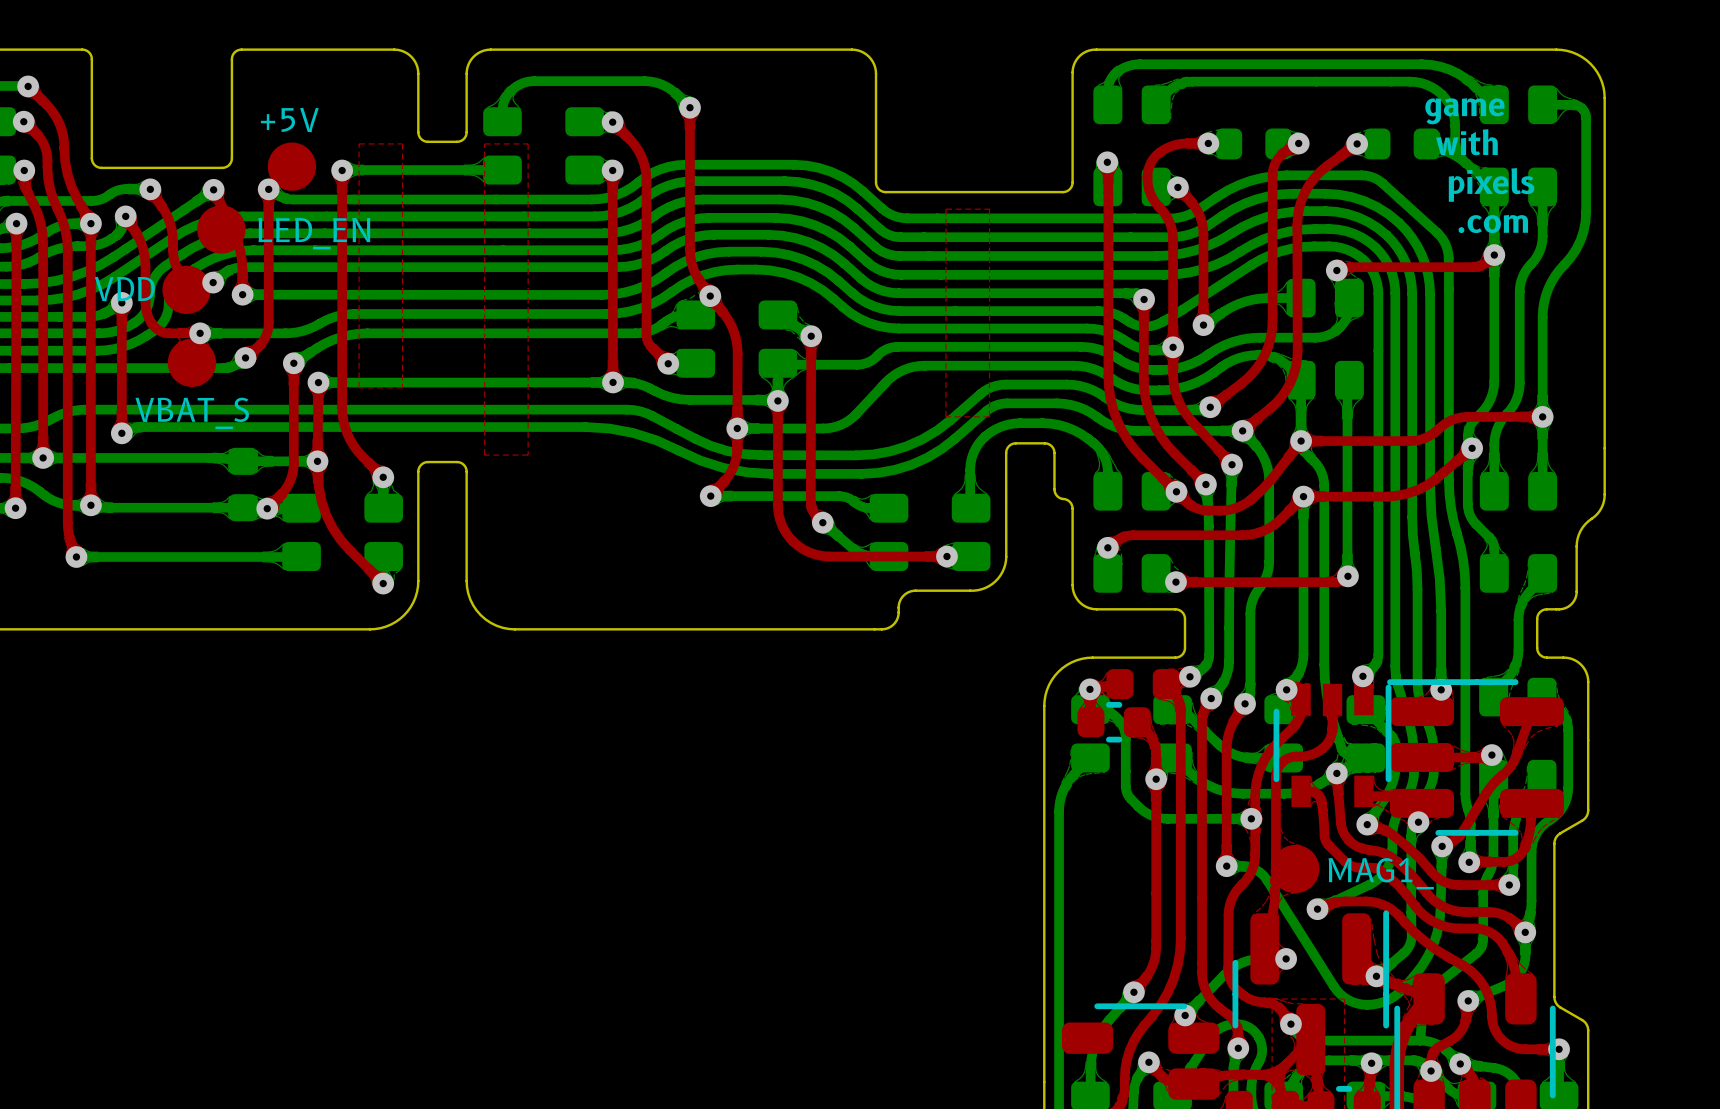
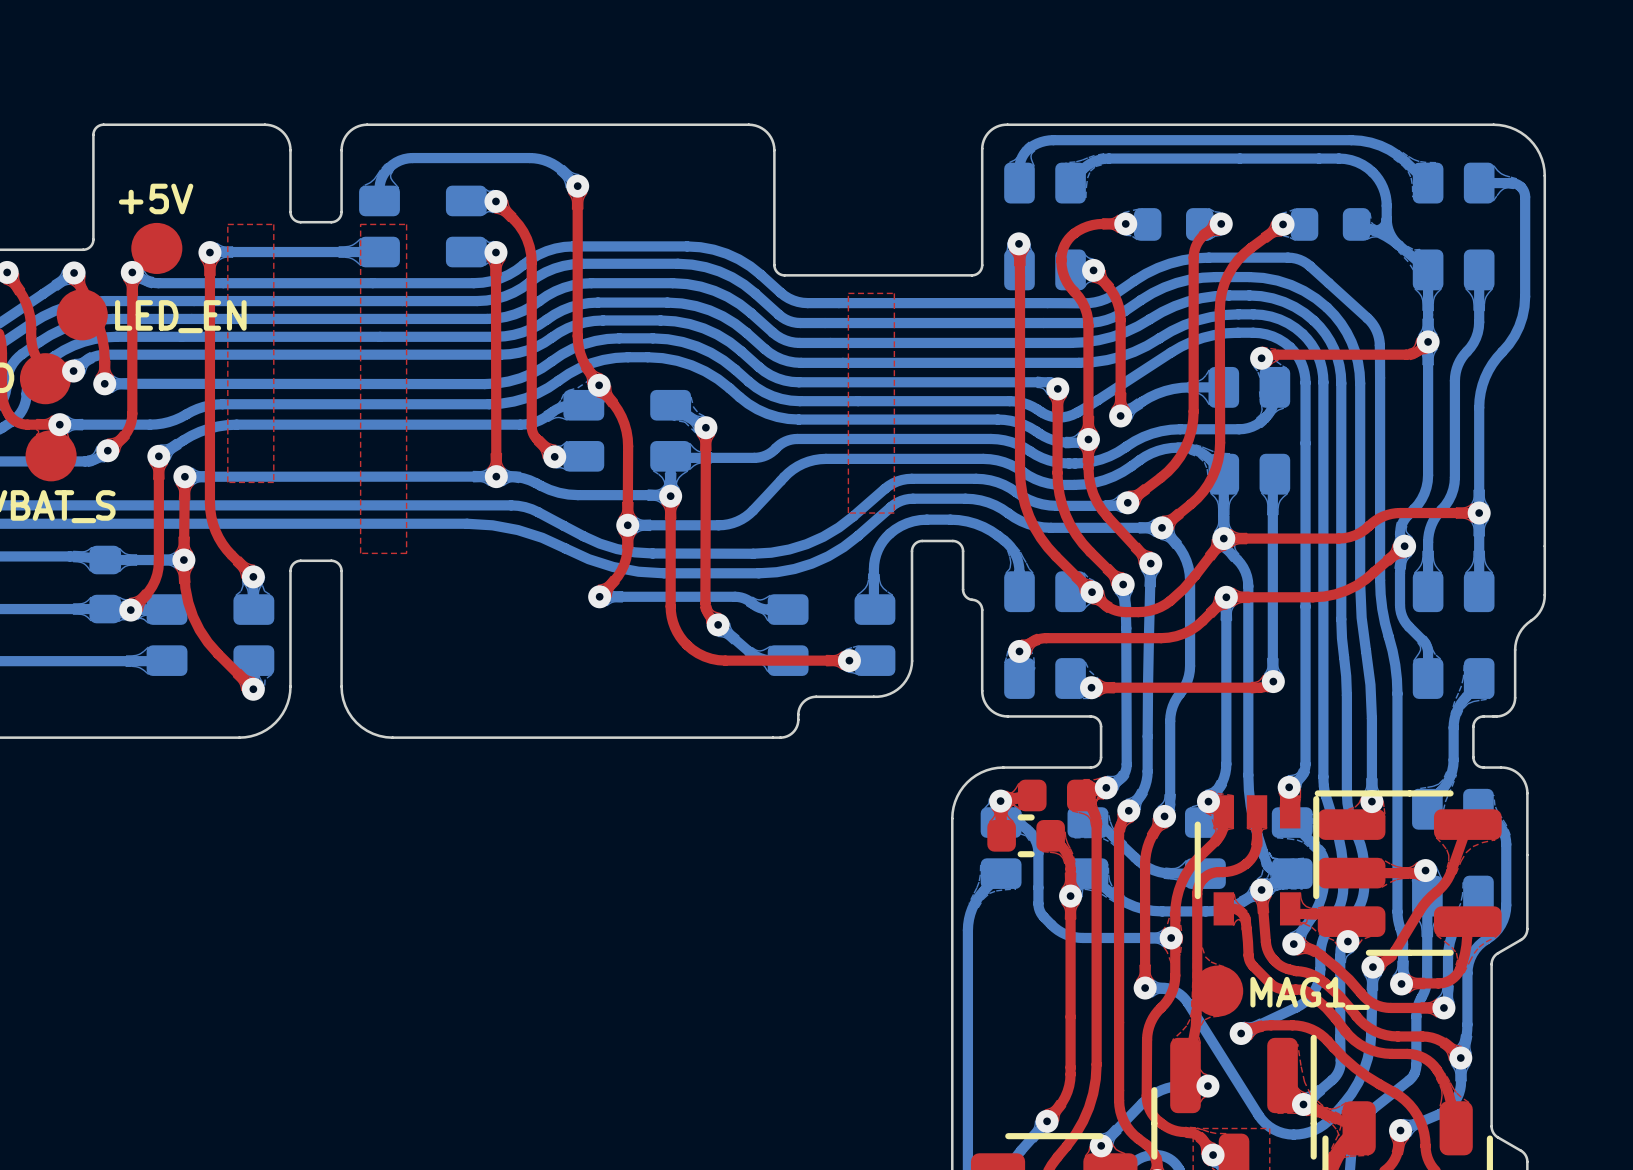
text: game (1464, 111) -> none
text: with (1466, 142) -> none
text: pixels (1491, 184) -> none
text: .com (1493, 224) -> none

